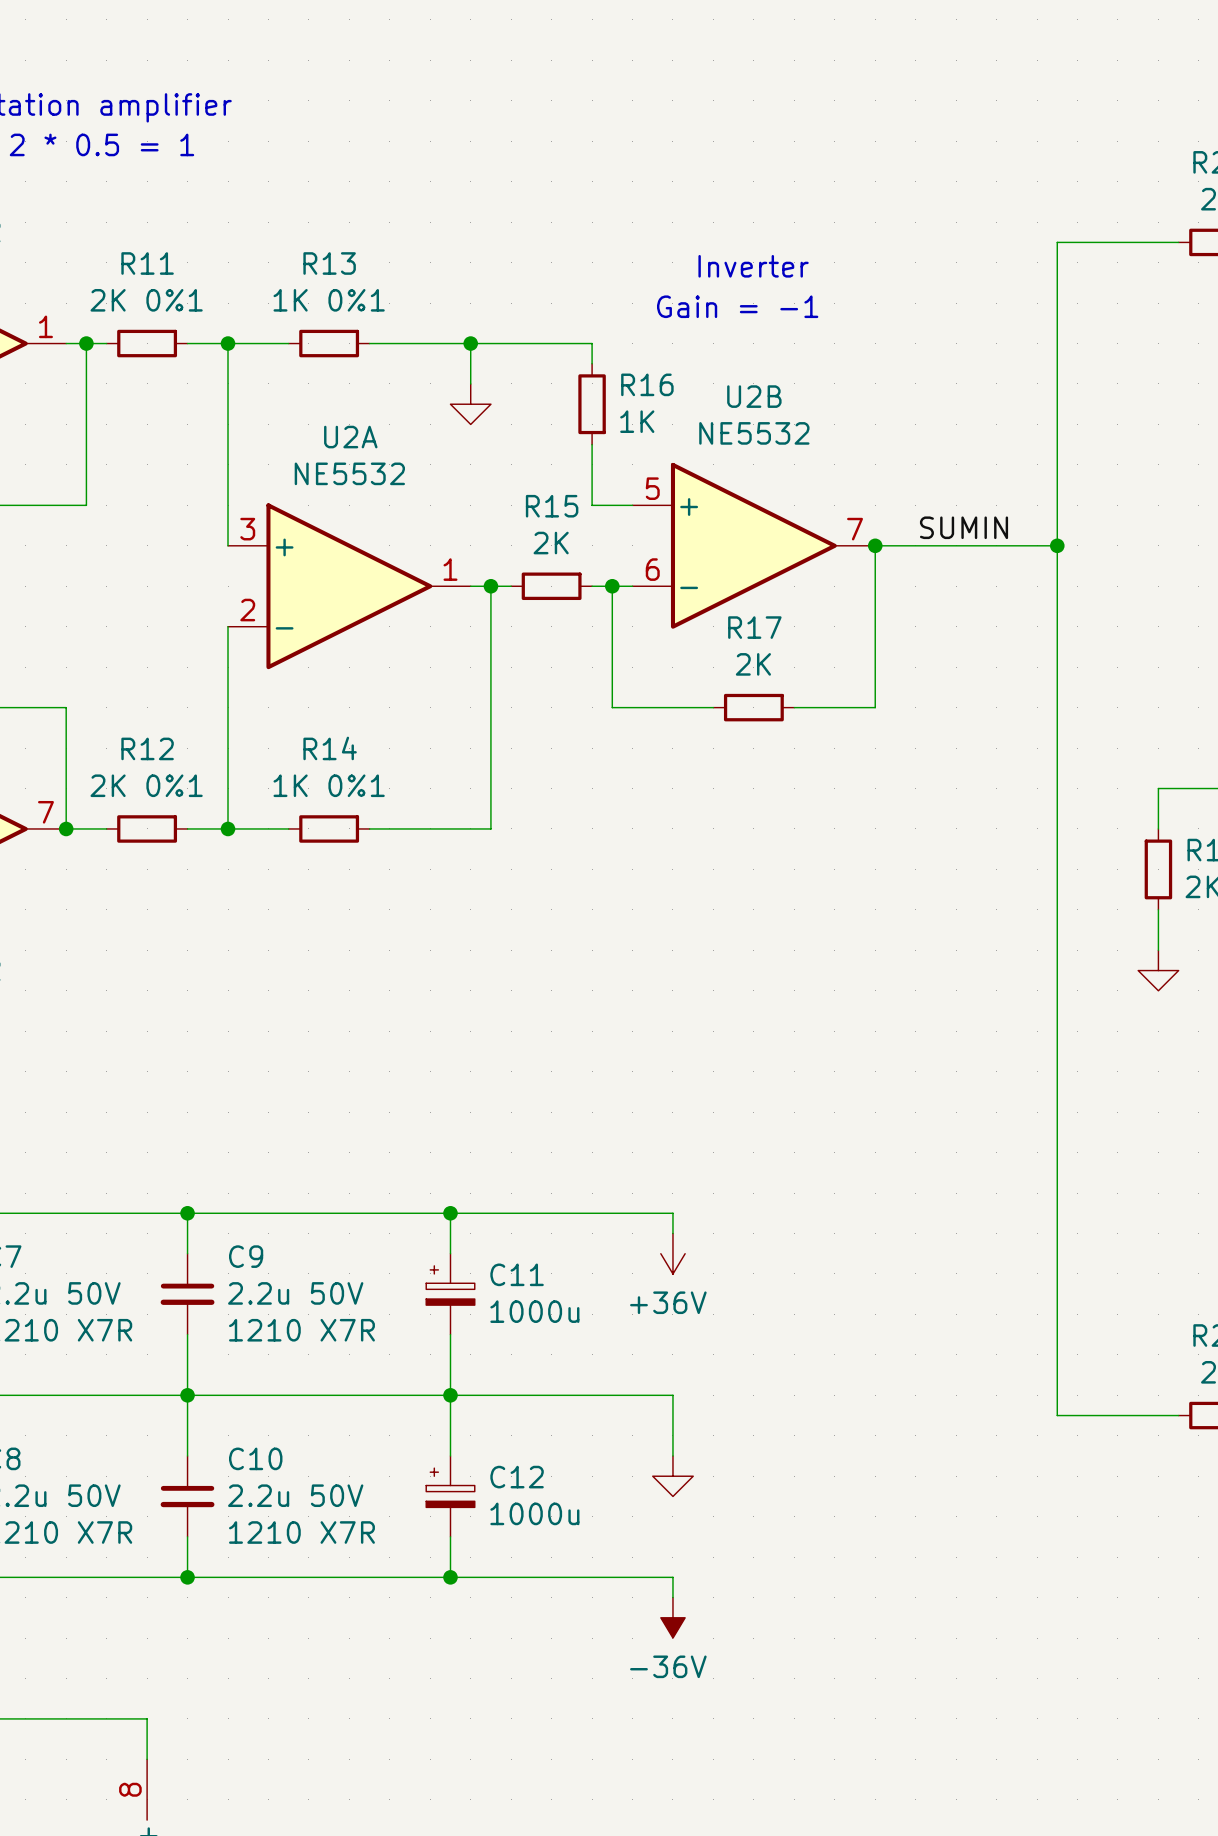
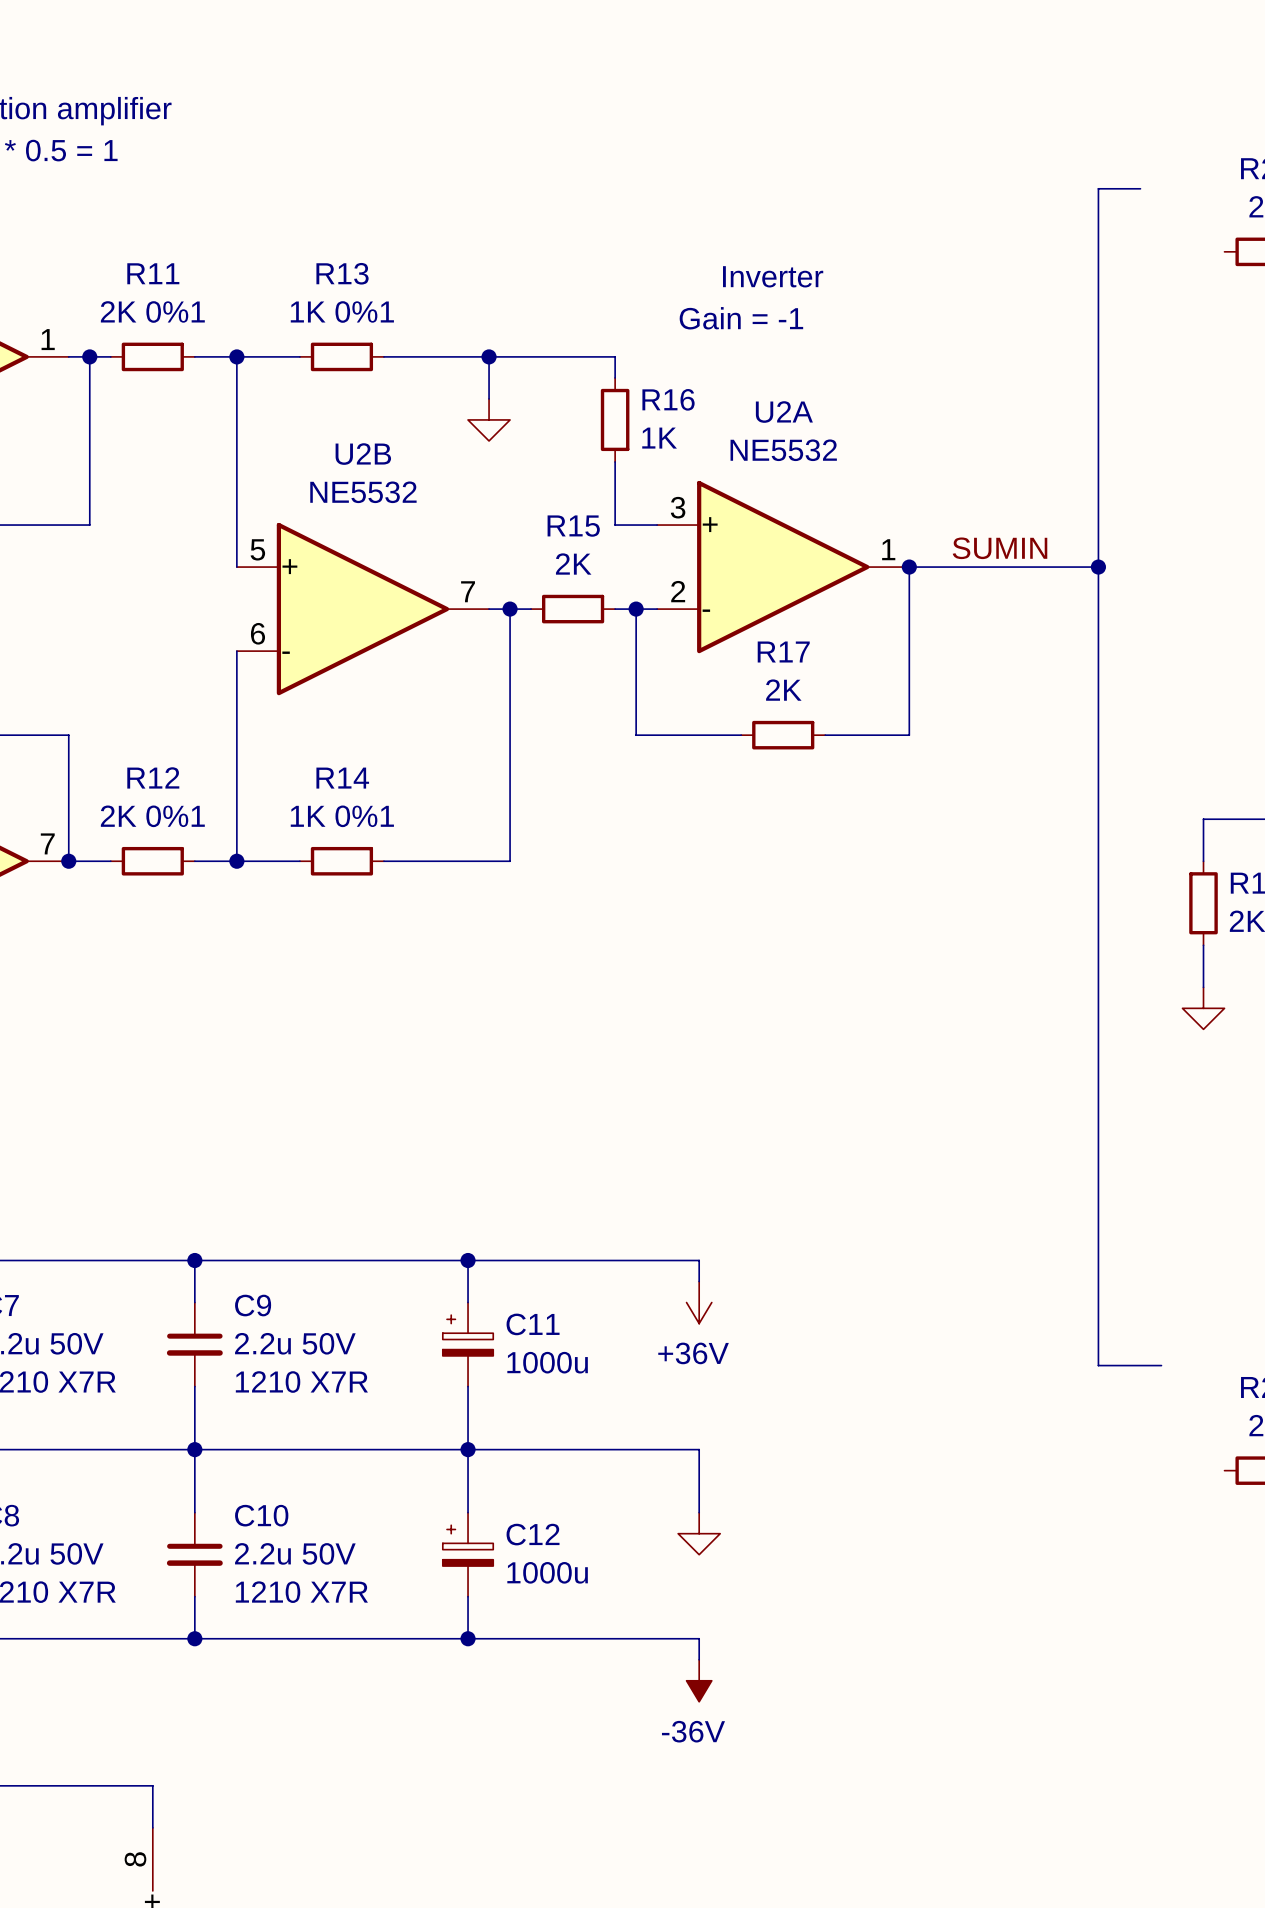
wire: (1057, 242) (1178, 242) -> (1098, 251) (1098, 188) (1140, 188)
U2B position: (753, 545) -> (362, 609)
U2A position: (349, 586) -> (783, 567)
wire: (1057, 1314) (1057, 1415) (1178, 1415) -> (1098, 1365) (1161, 1365)

